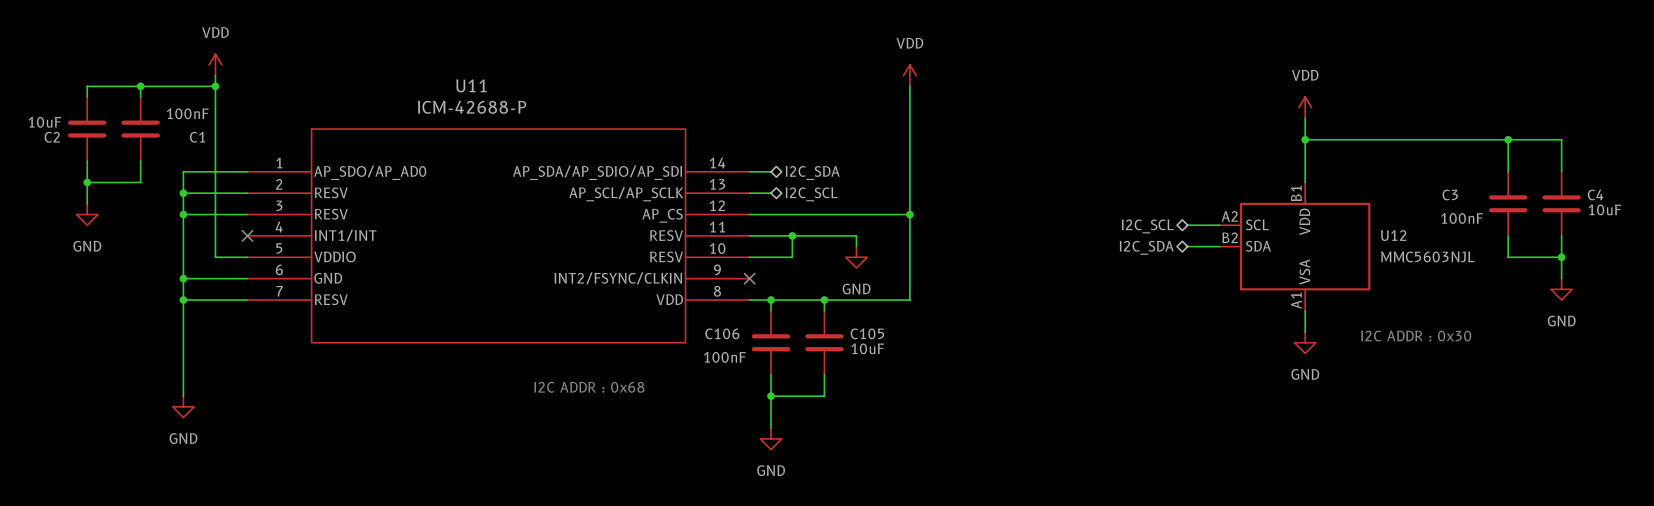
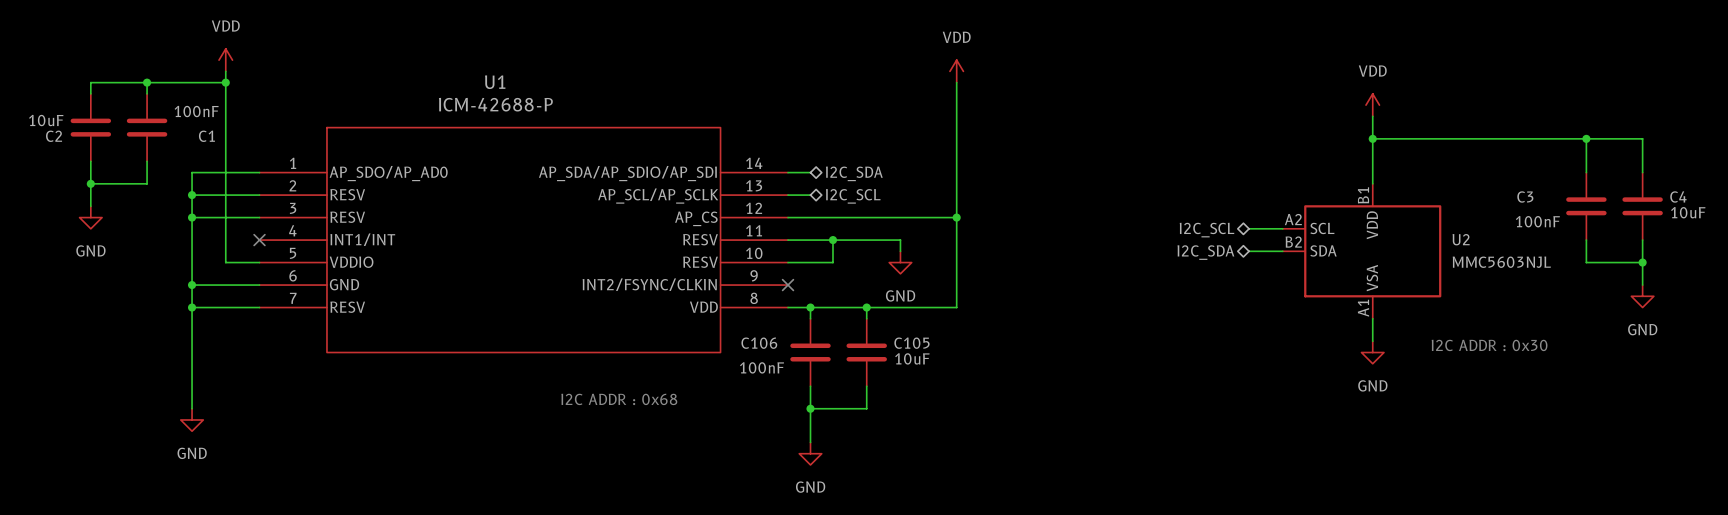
U11 name: U11 (471, 85) -> U1 (495, 82)
U12 name: U12 (1393, 235) -> U2 (1461, 239)

